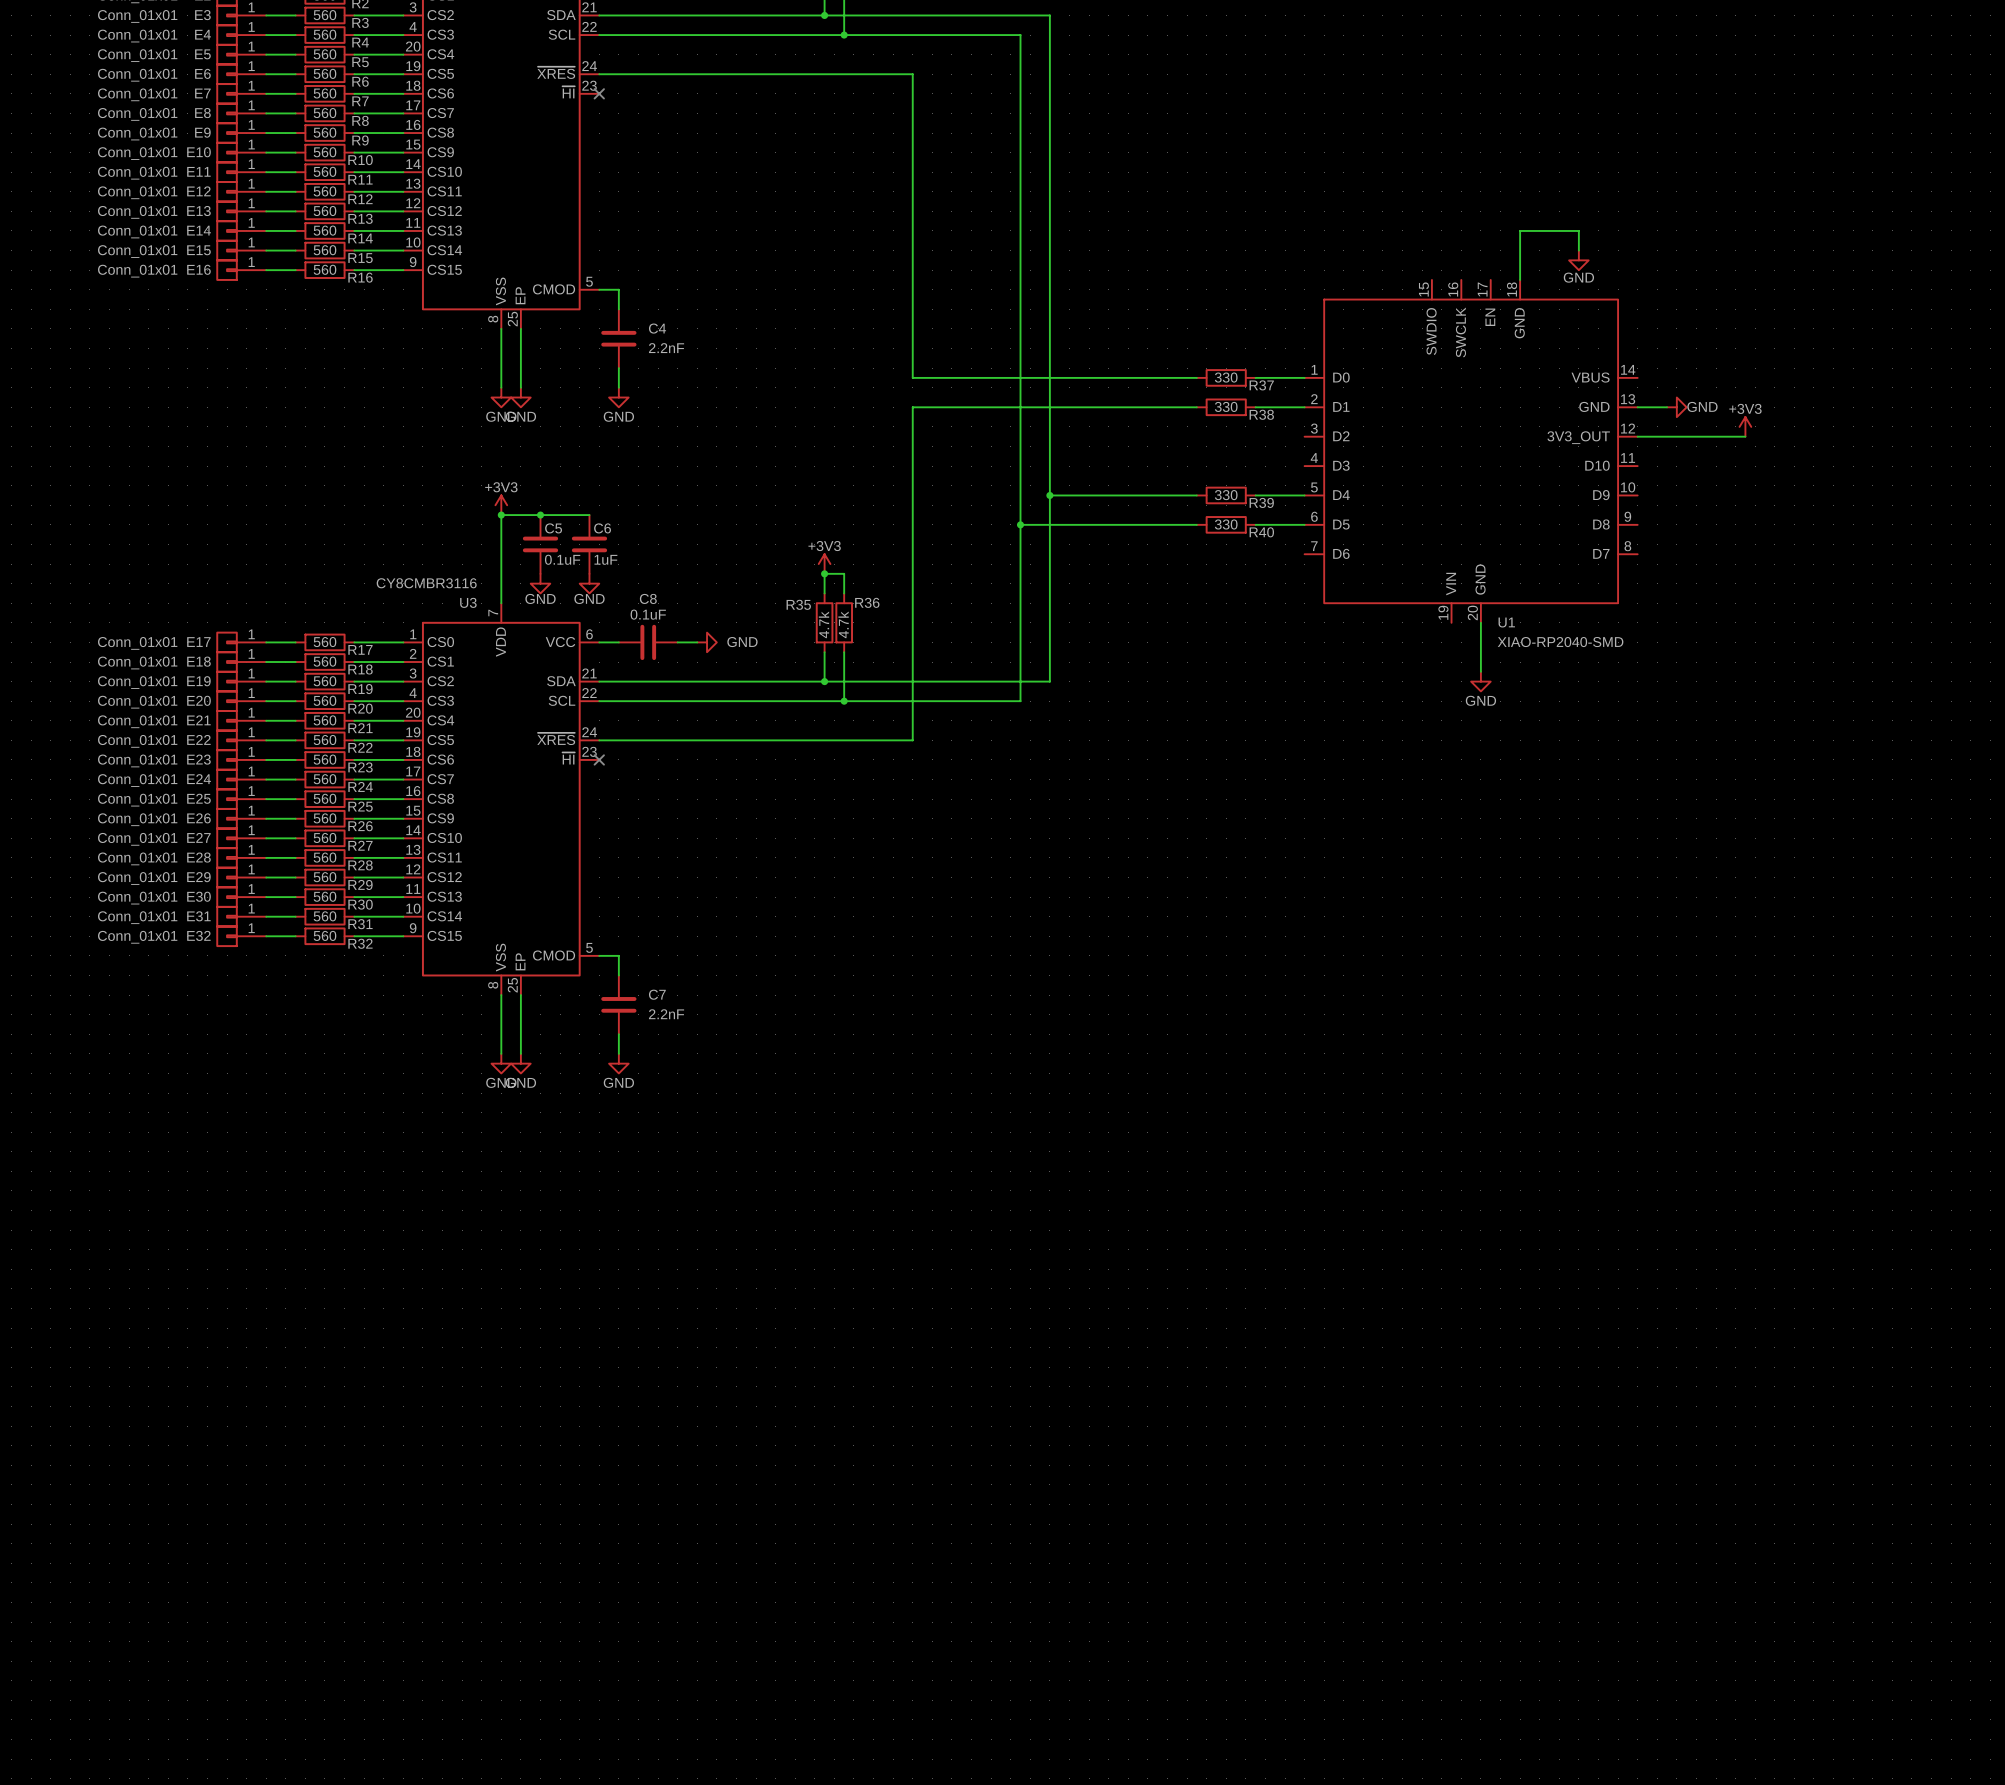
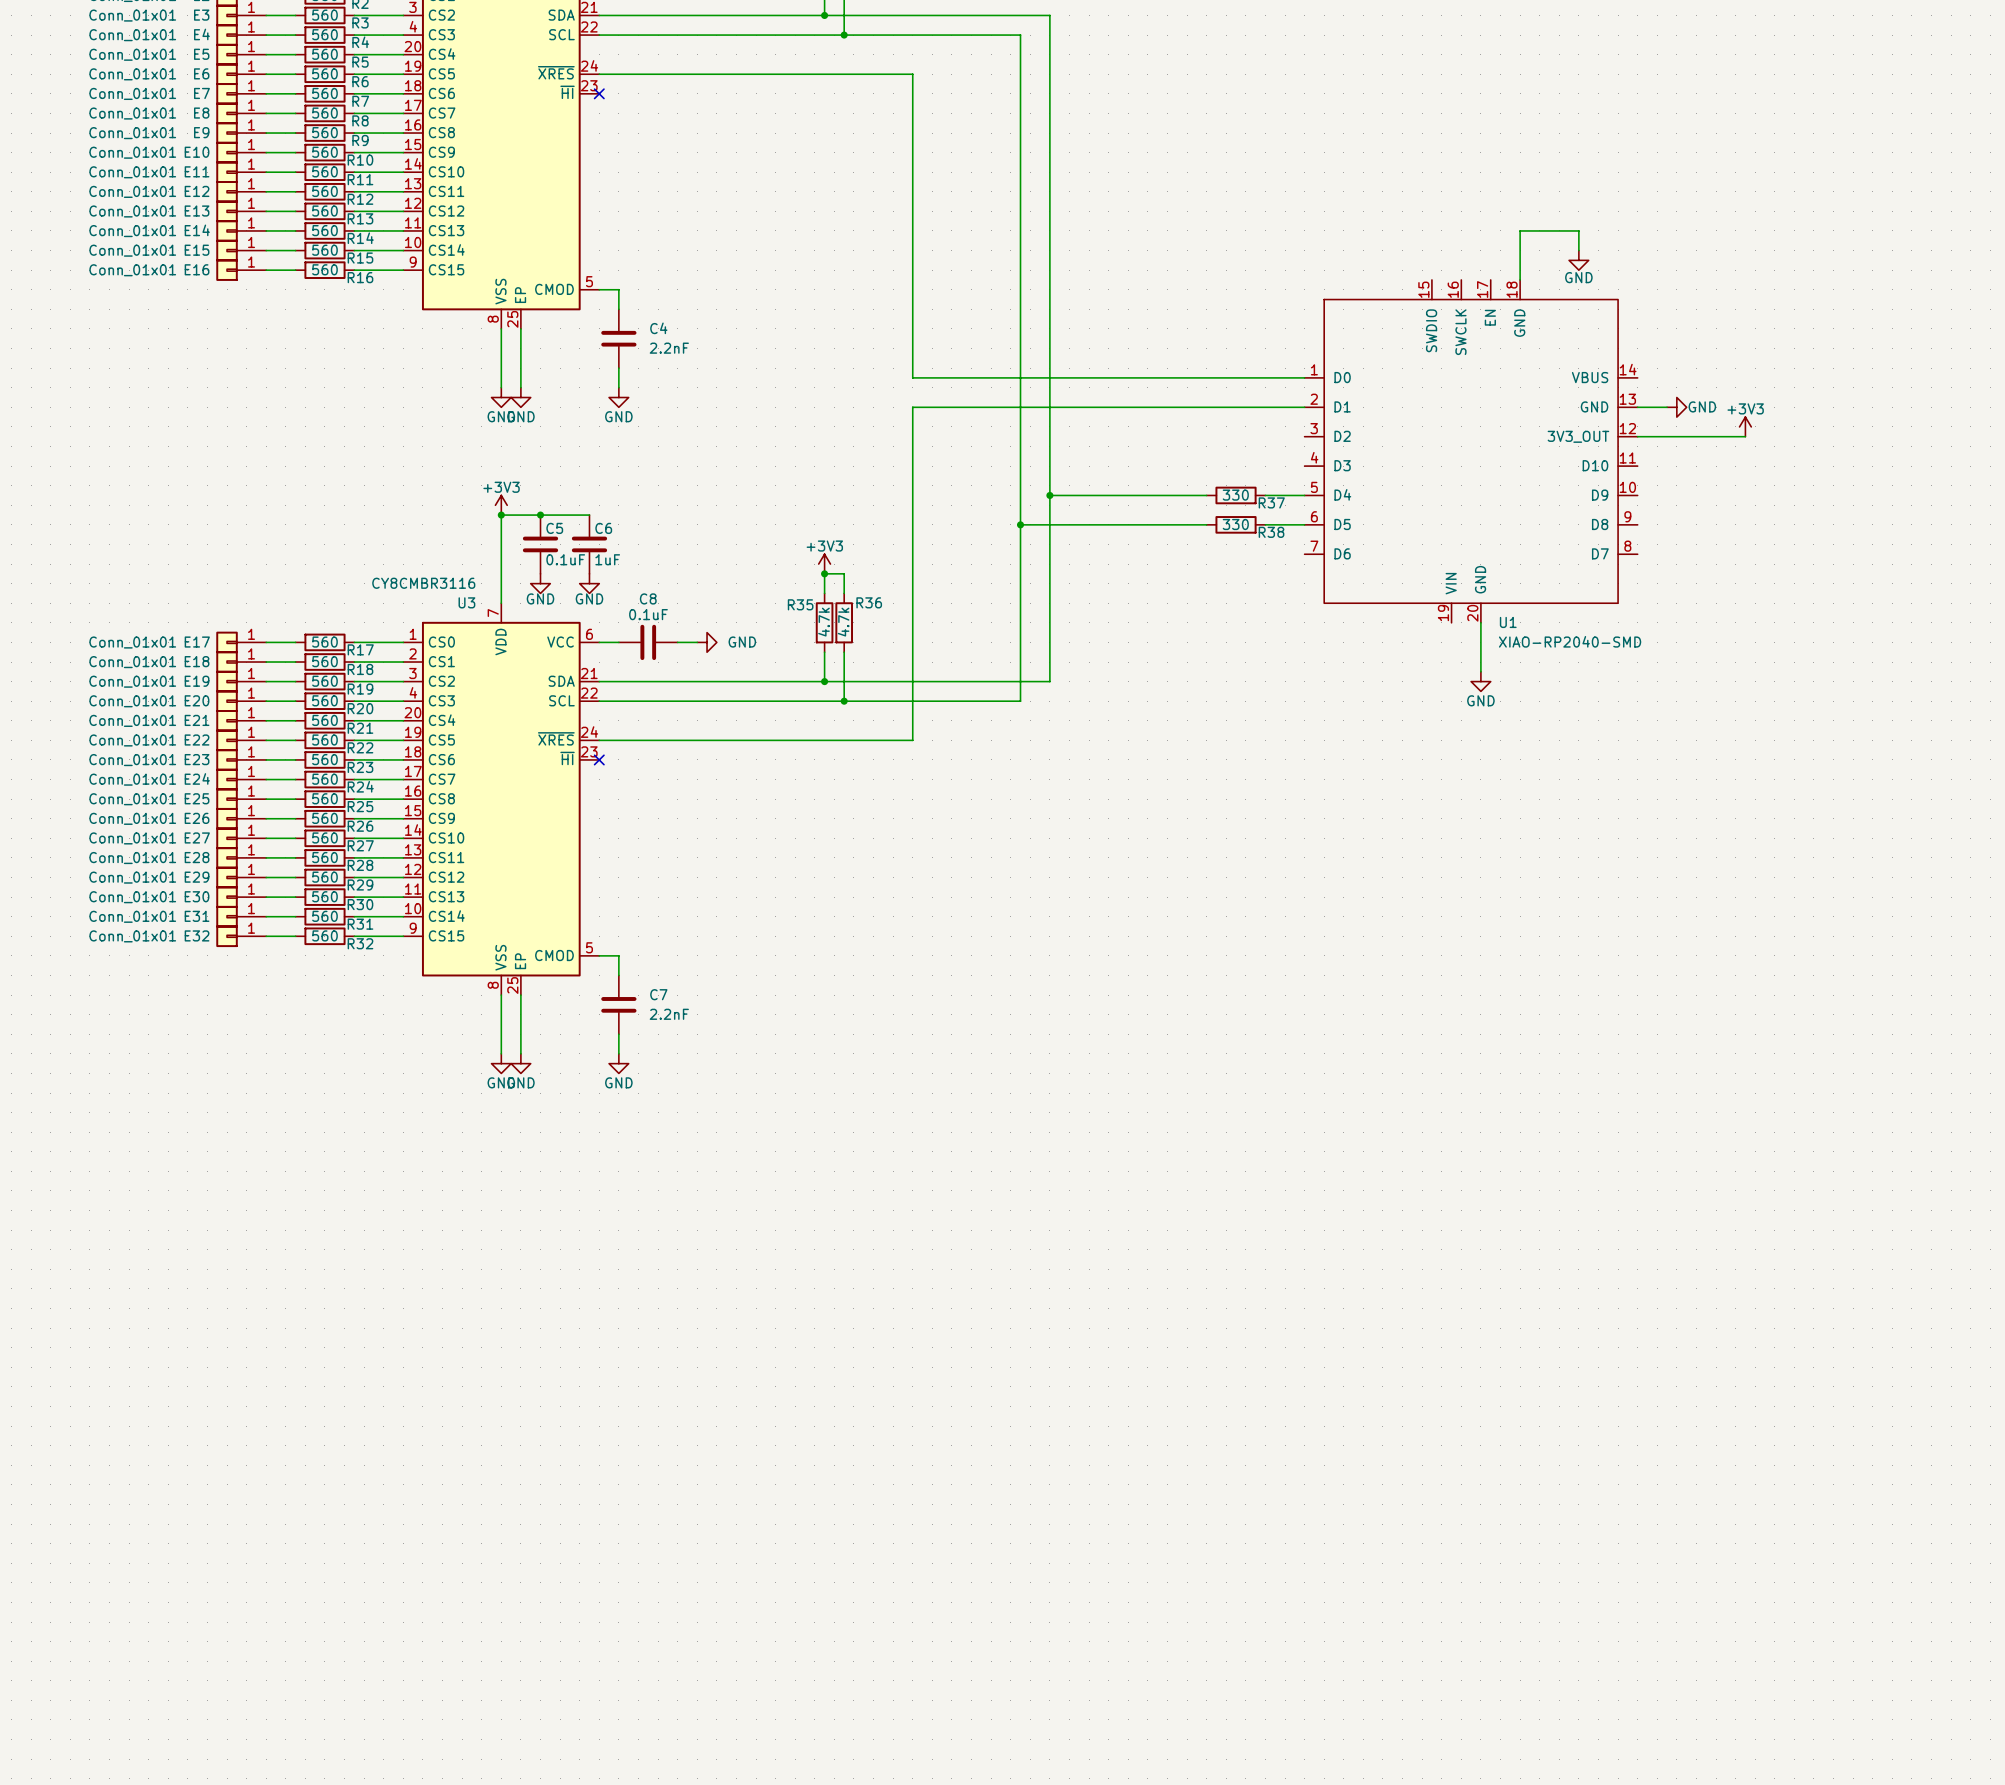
wire: none -> (1196, 377) (1255, 377)
R37 position: (1226, 377) -> (1236, 495)
wire: none -> (1196, 407) (1255, 407)
R38 position: (1226, 407) -> (1236, 524)
R39: 330 (1226, 495) -> none
R40: 330 (1226, 524) -> none

